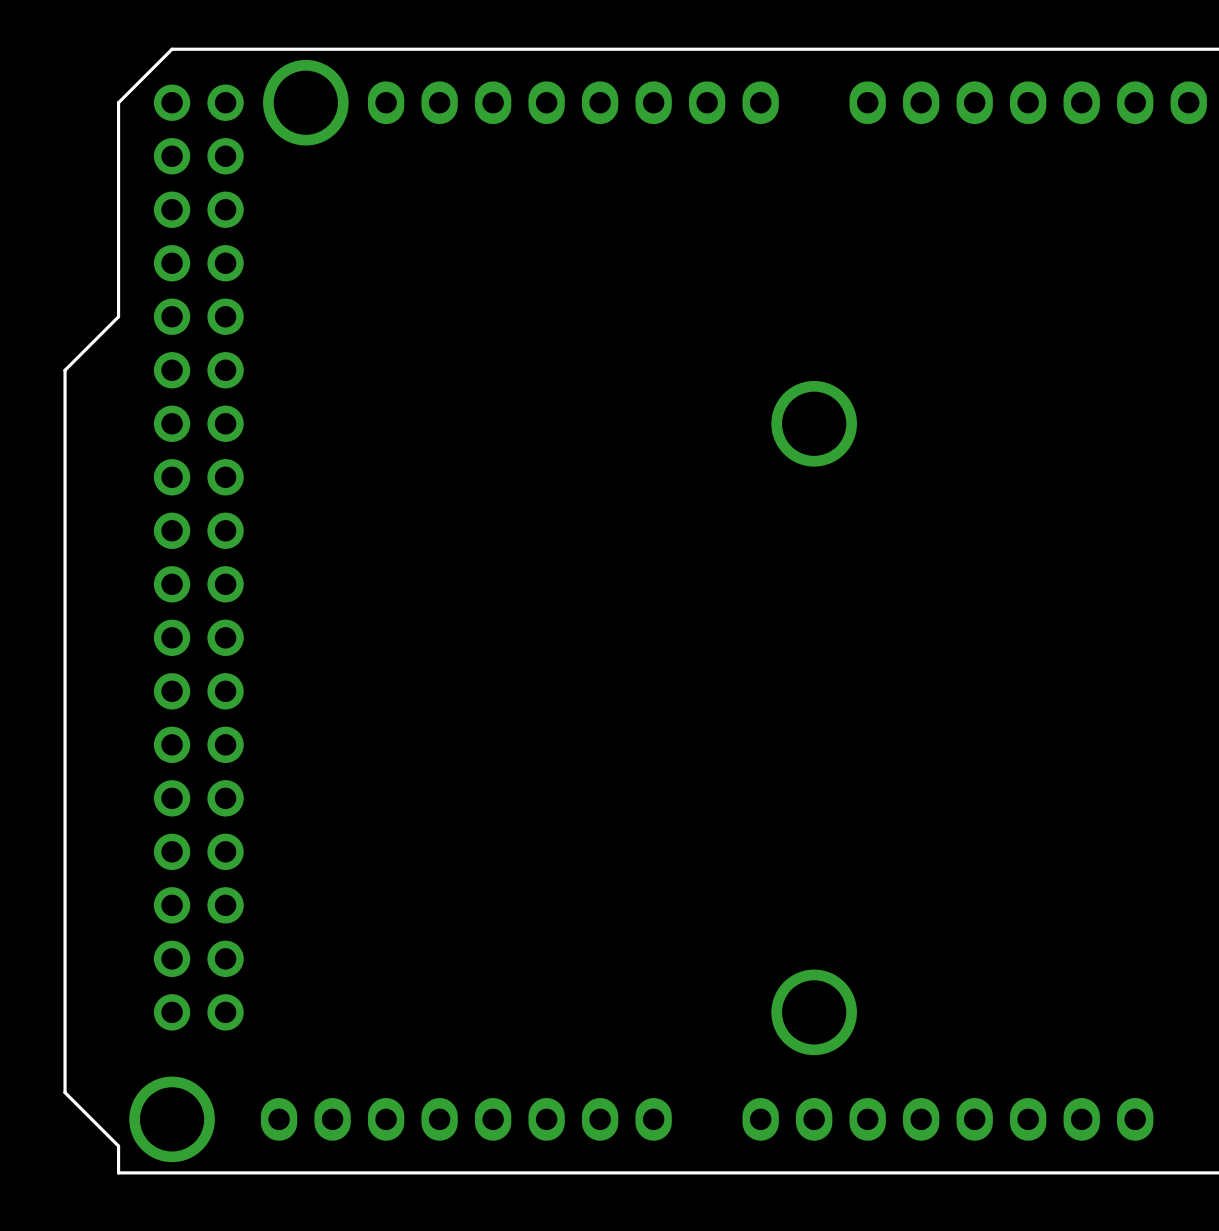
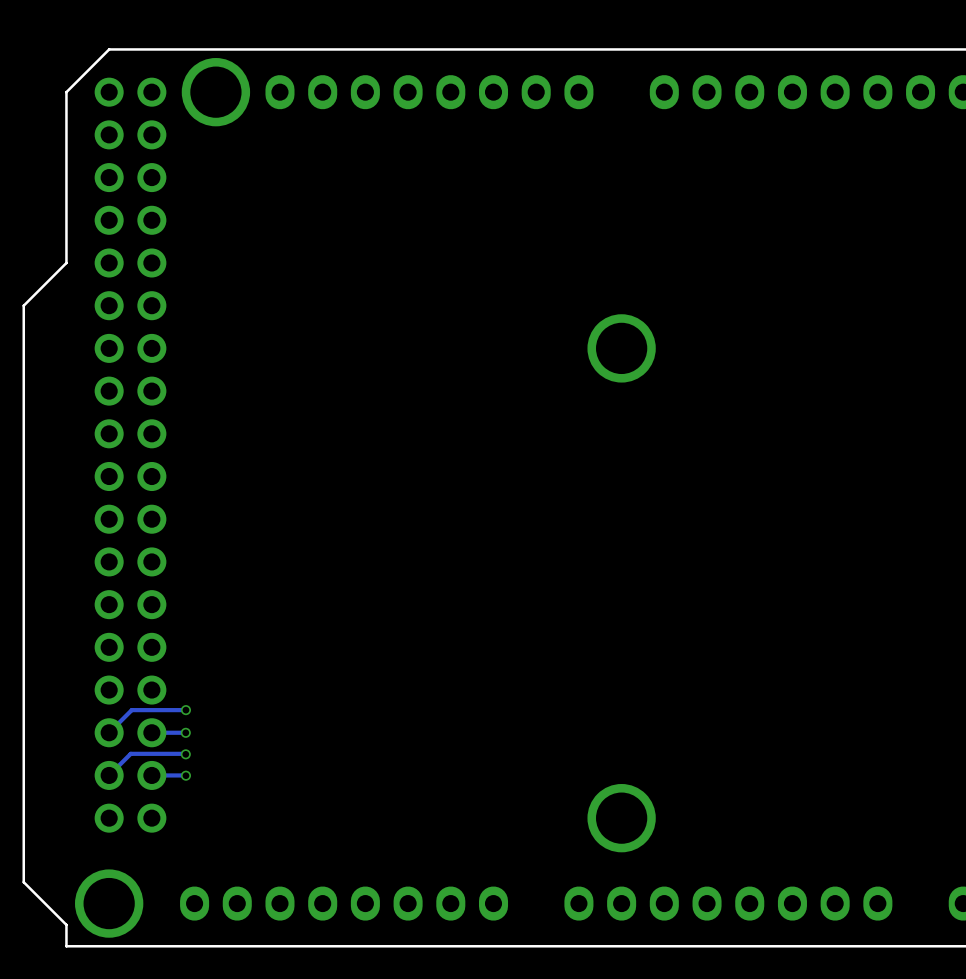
track: none -> (185, 710) (131, 710) (109, 732)
via: none -> (185, 710)
track: none -> (185, 732) (151, 732)
via: none -> (185, 732)
track: none -> (186, 753) (130, 753) (109, 775)
via: none -> (185, 754)
track: none -> (185, 775) (151, 775)
via: none -> (185, 775)

